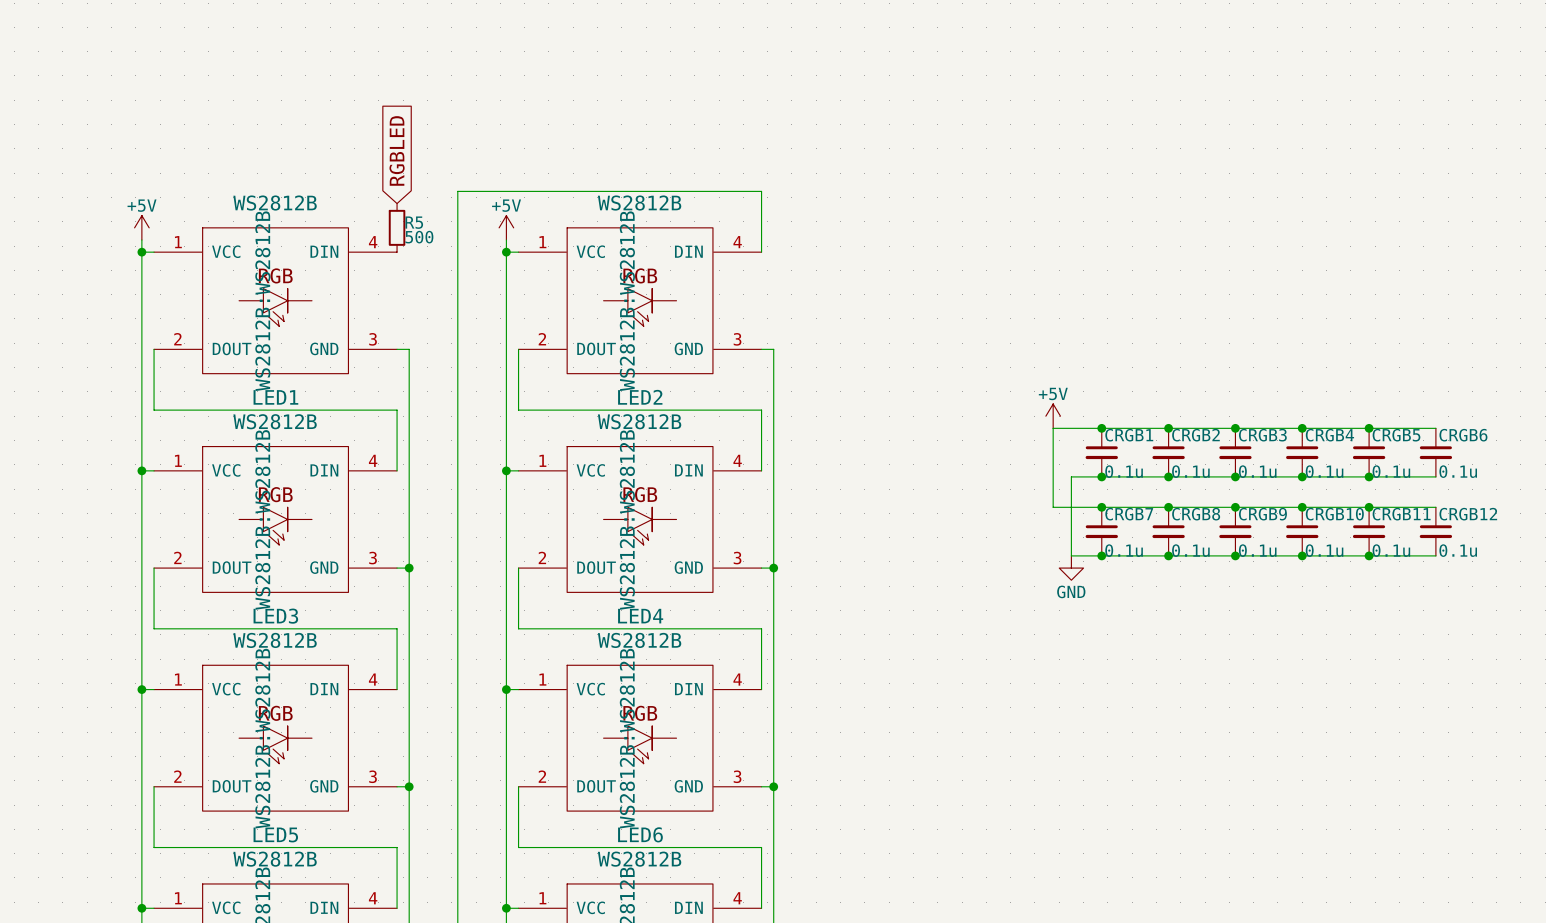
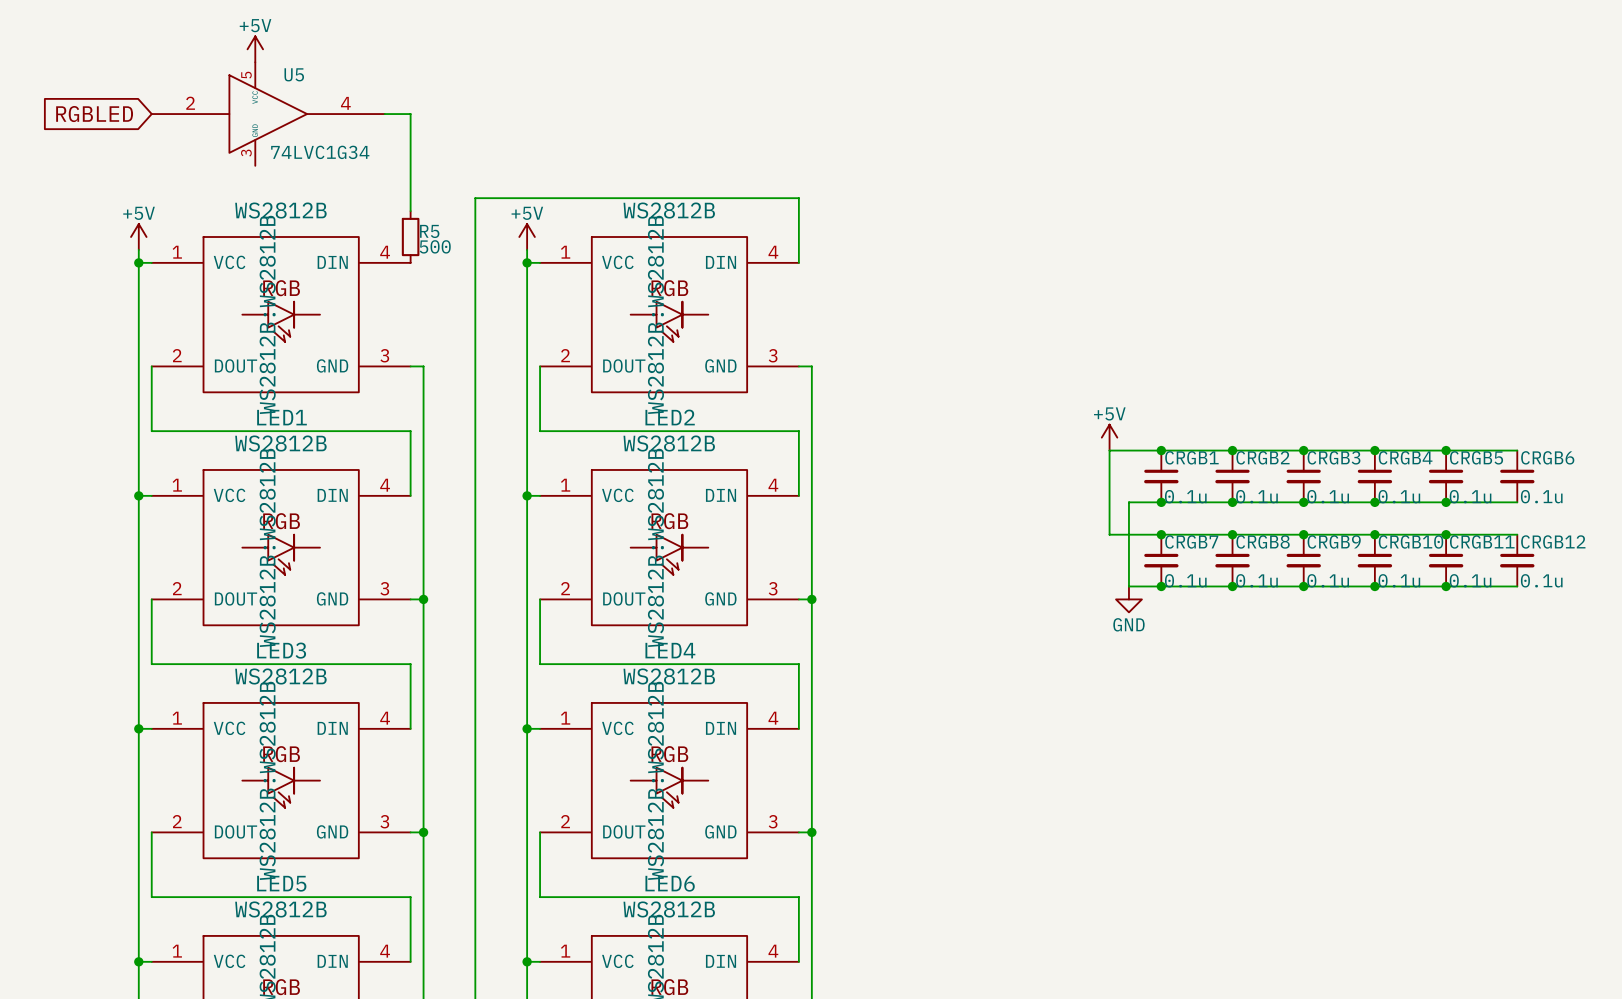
power symbol: none -> +5V (255, 49)
global label: none -> RGBLED (94, 114)
U5: none -> 74LVC1G34 (268, 114)
wire: none -> (384, 114) (410, 114) (410, 211)
global label: RGBLED (397, 150) -> none

